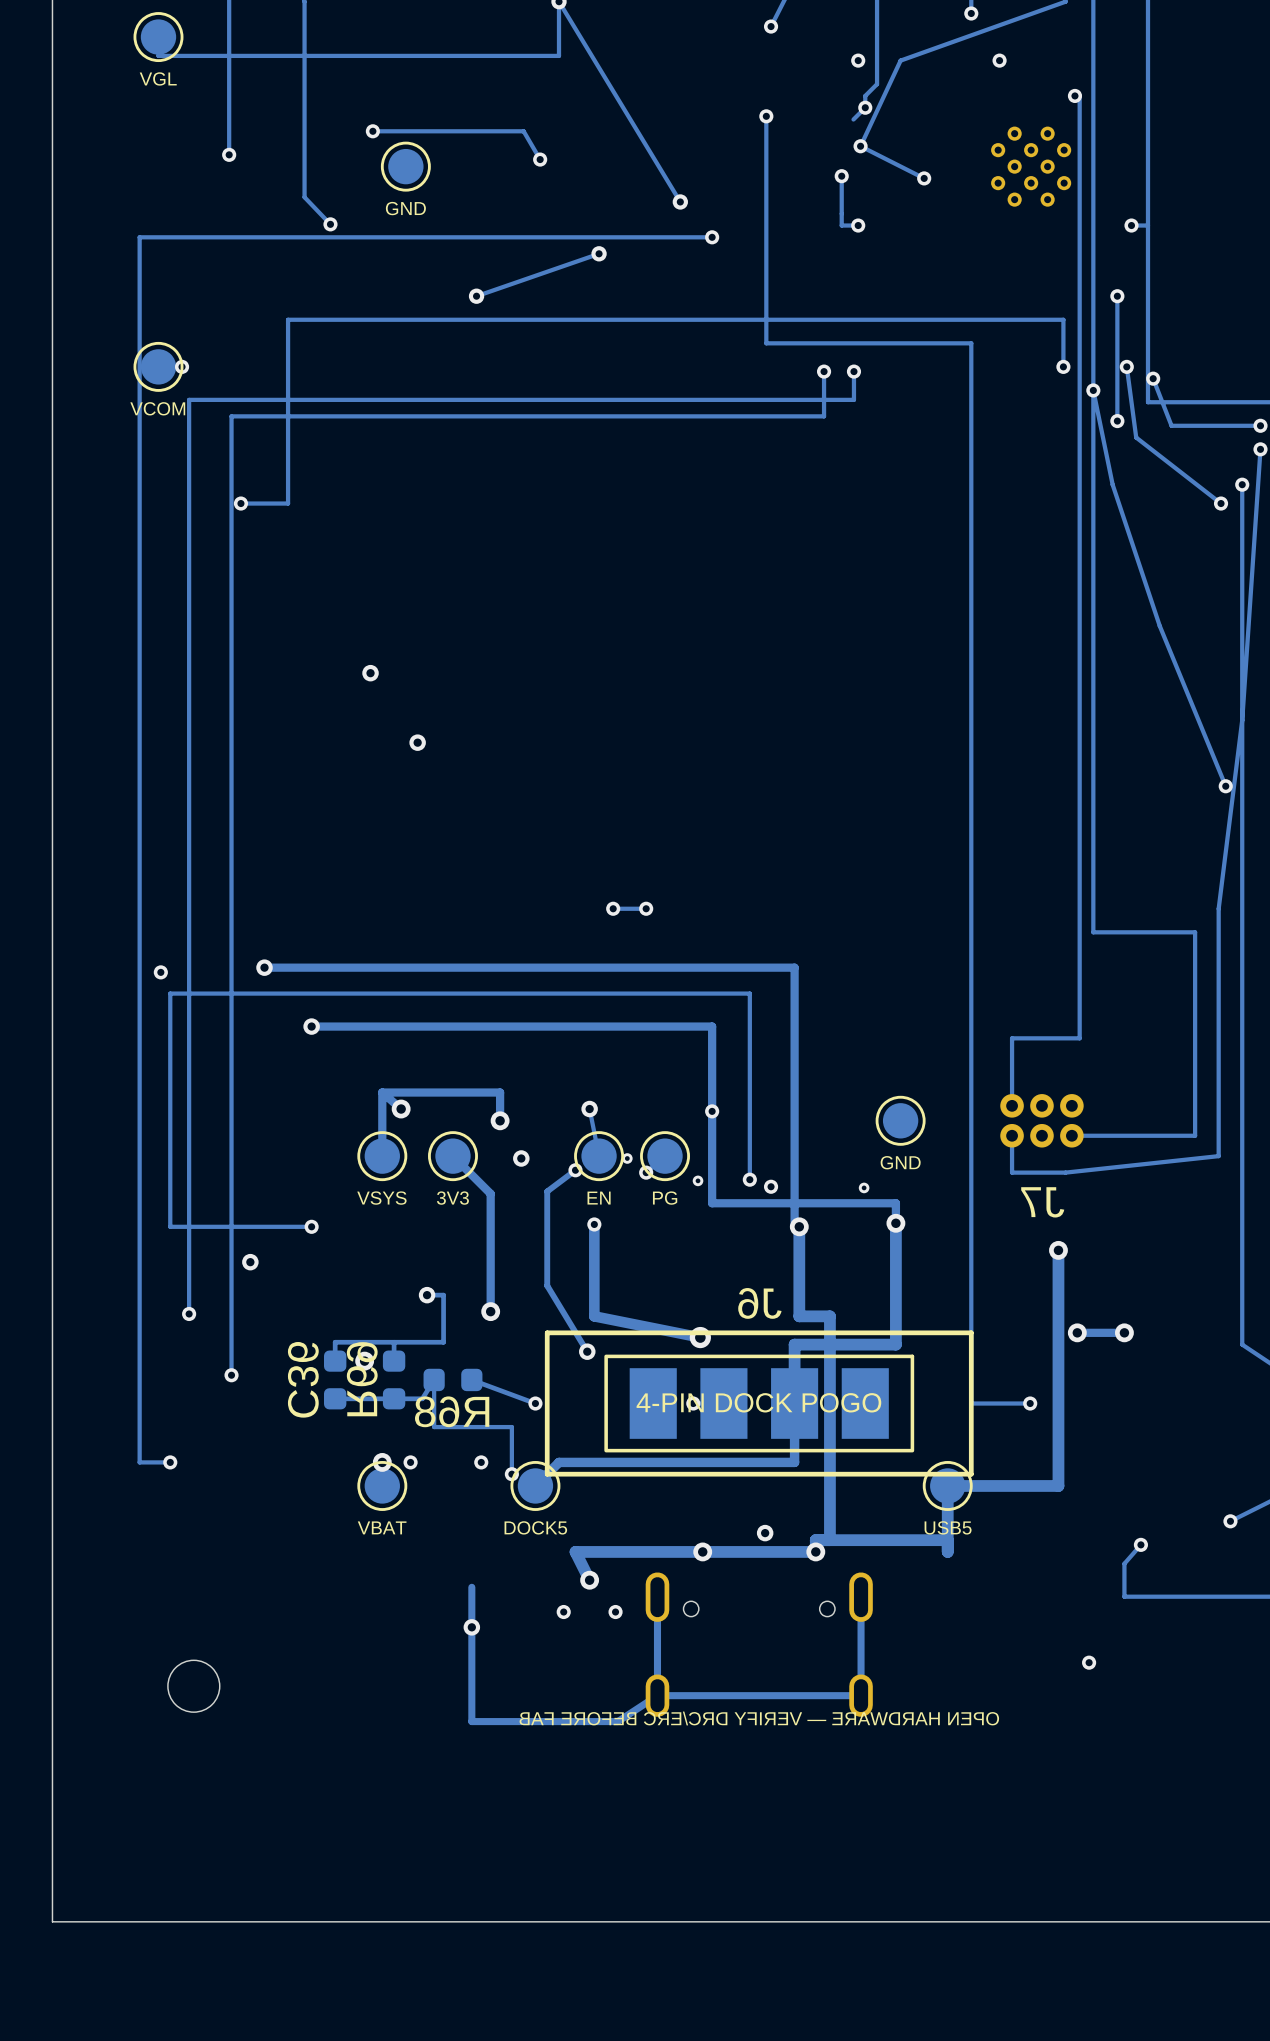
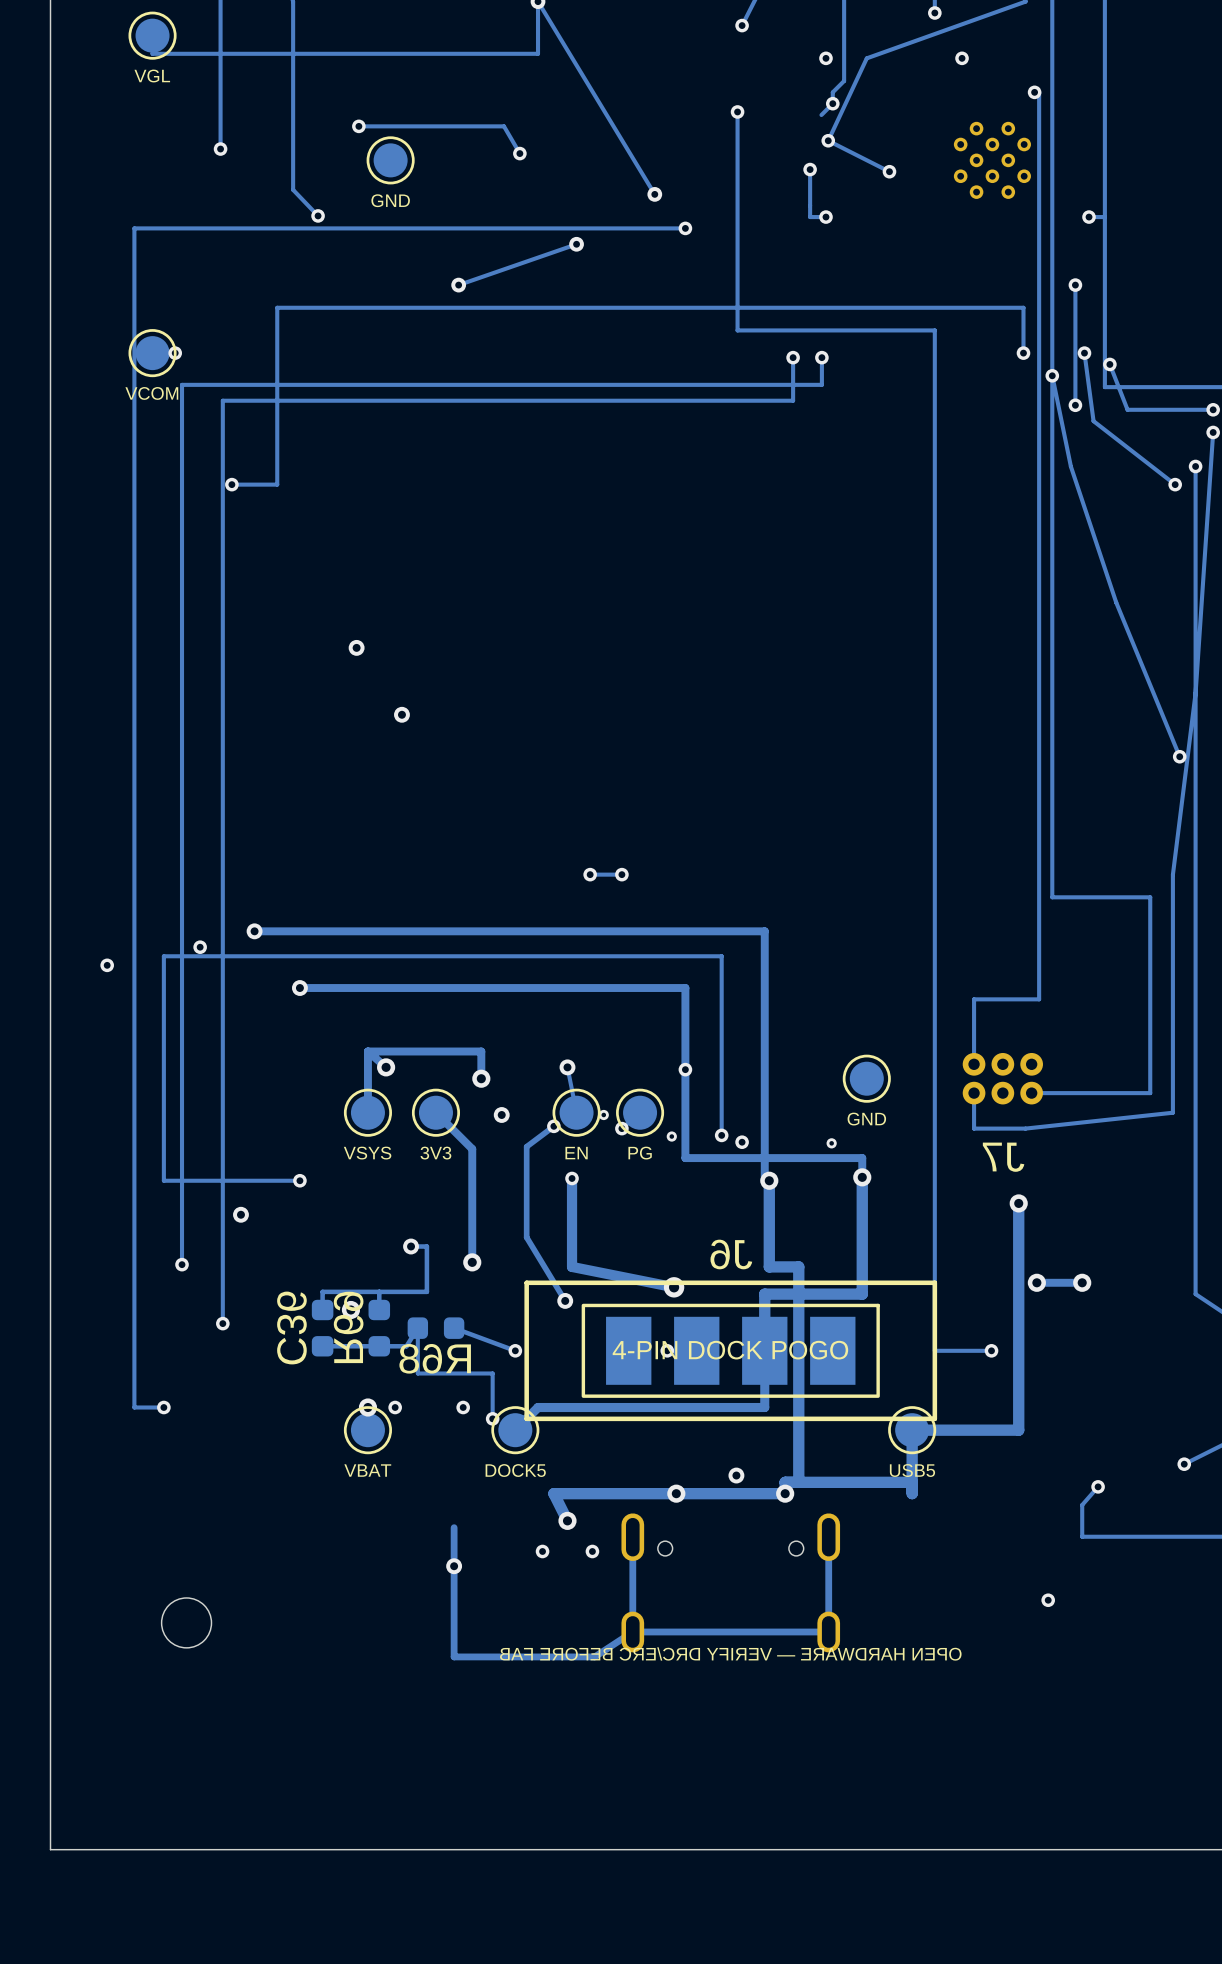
via: (160, 972) -> none
via: none -> (200, 947)
via: none -> (107, 965)

